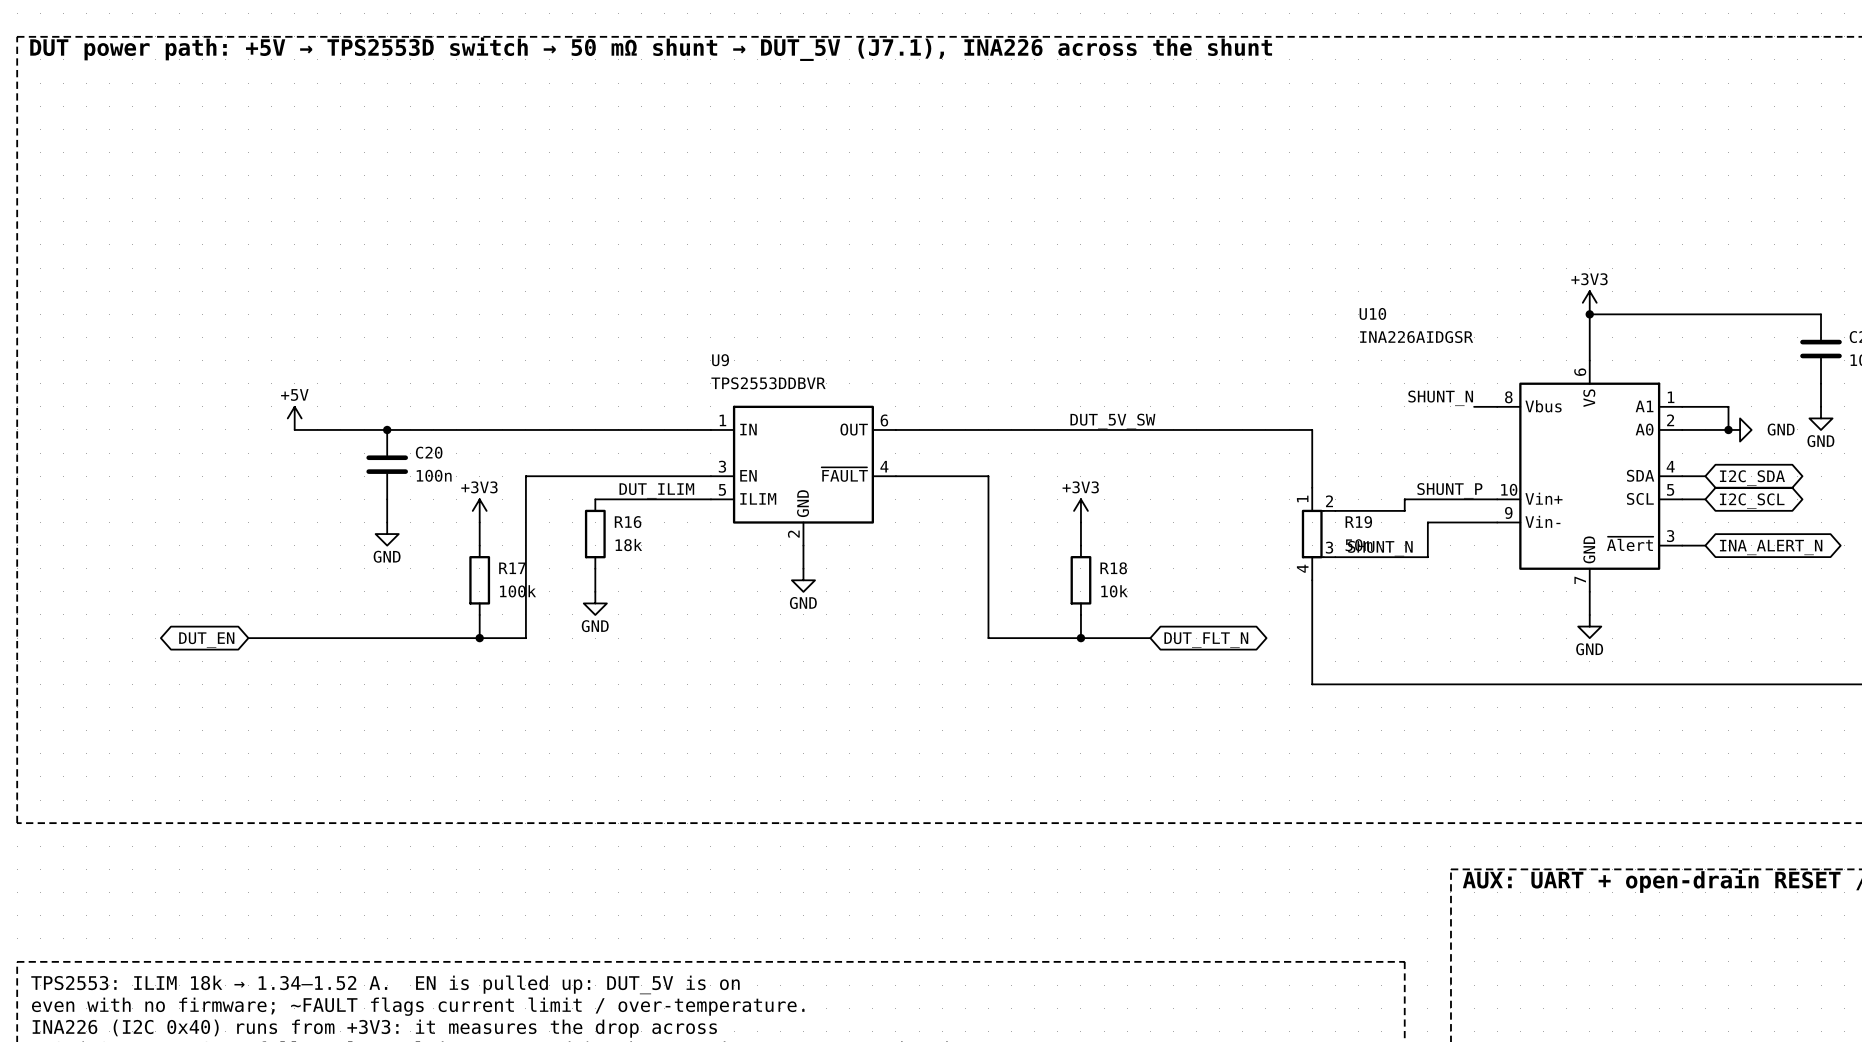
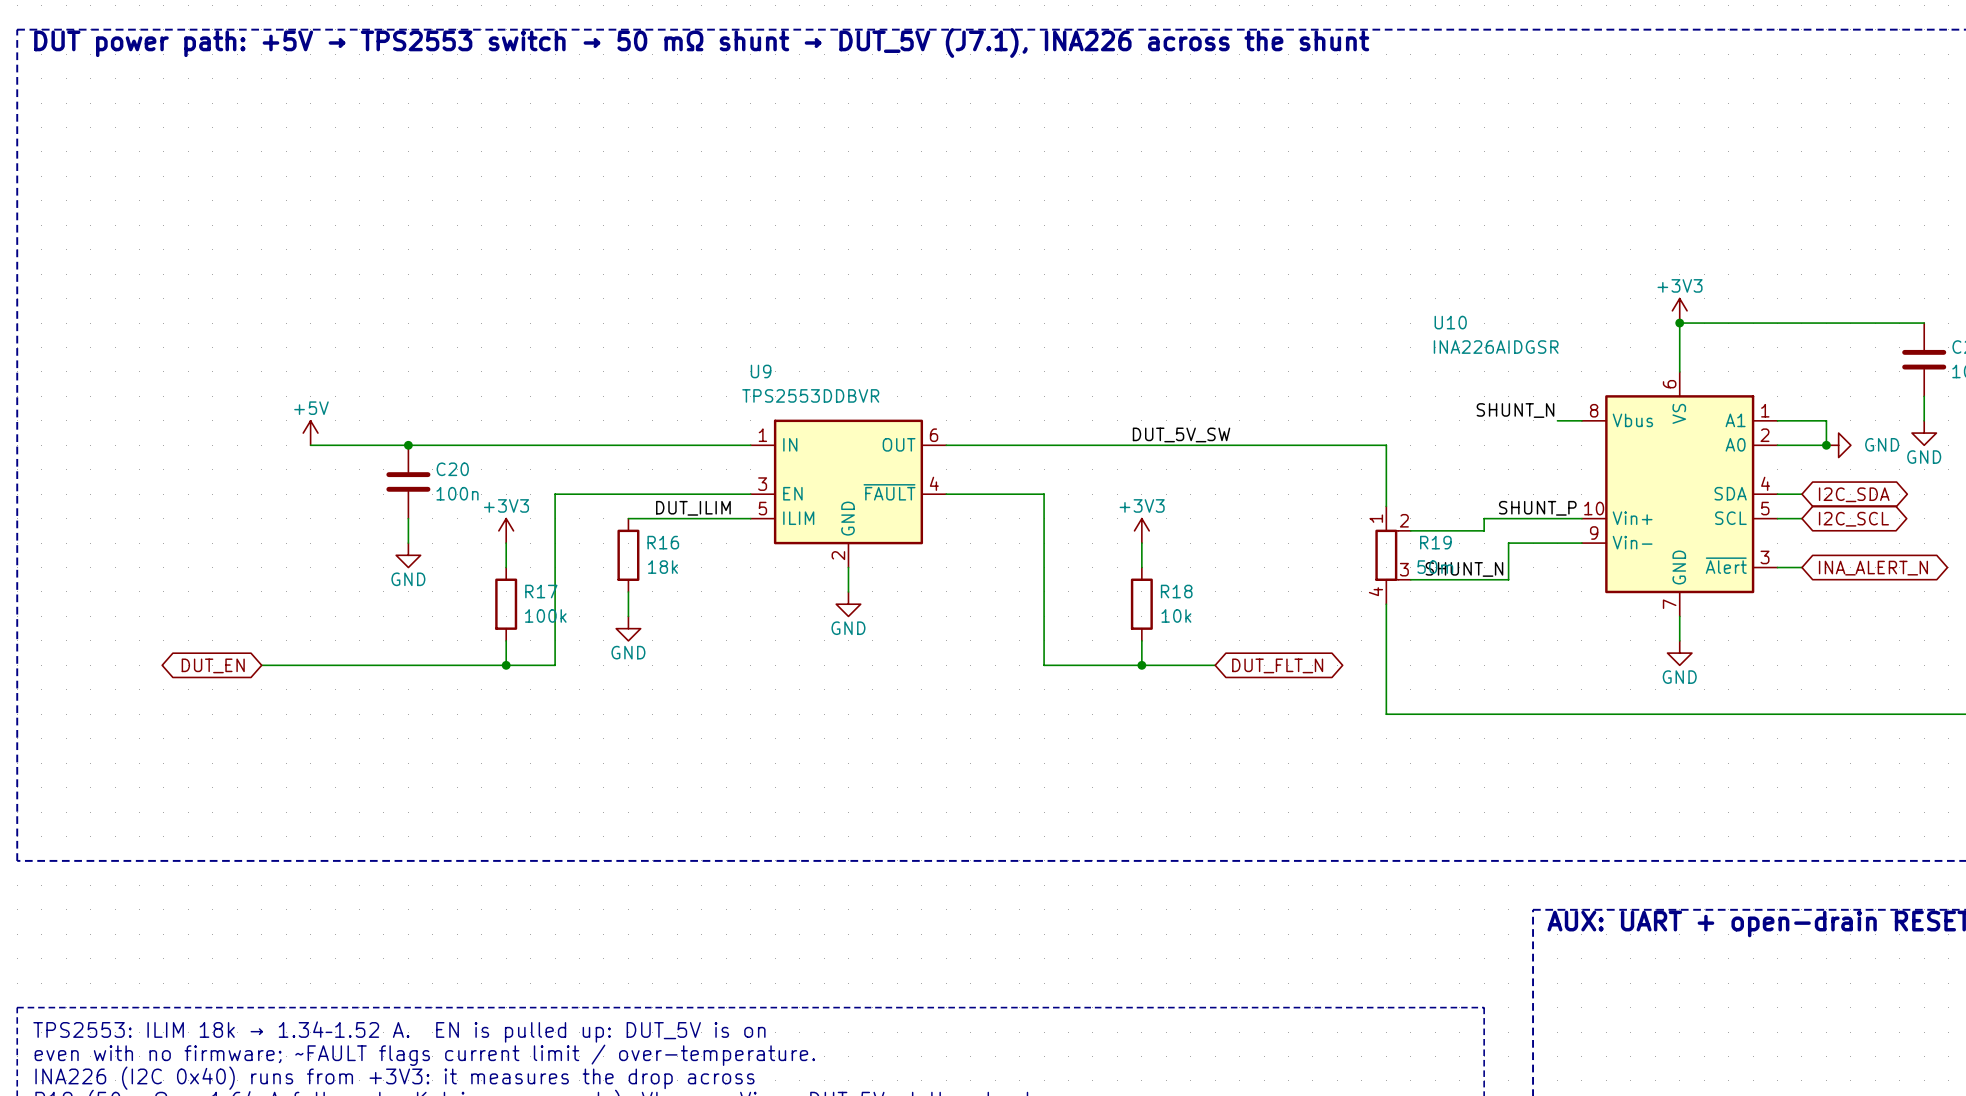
text: DUT power path: +5V → TPS2553D switch → 50 mΩ shunt → DUT_5V (J7.1), INA226 across the shunt (651, 49) -> DUT power path: +5V → TPS2553 switch → 50 mΩ shunt → DUT_5V (J7.1), INA226 across the shunt (701, 42)

